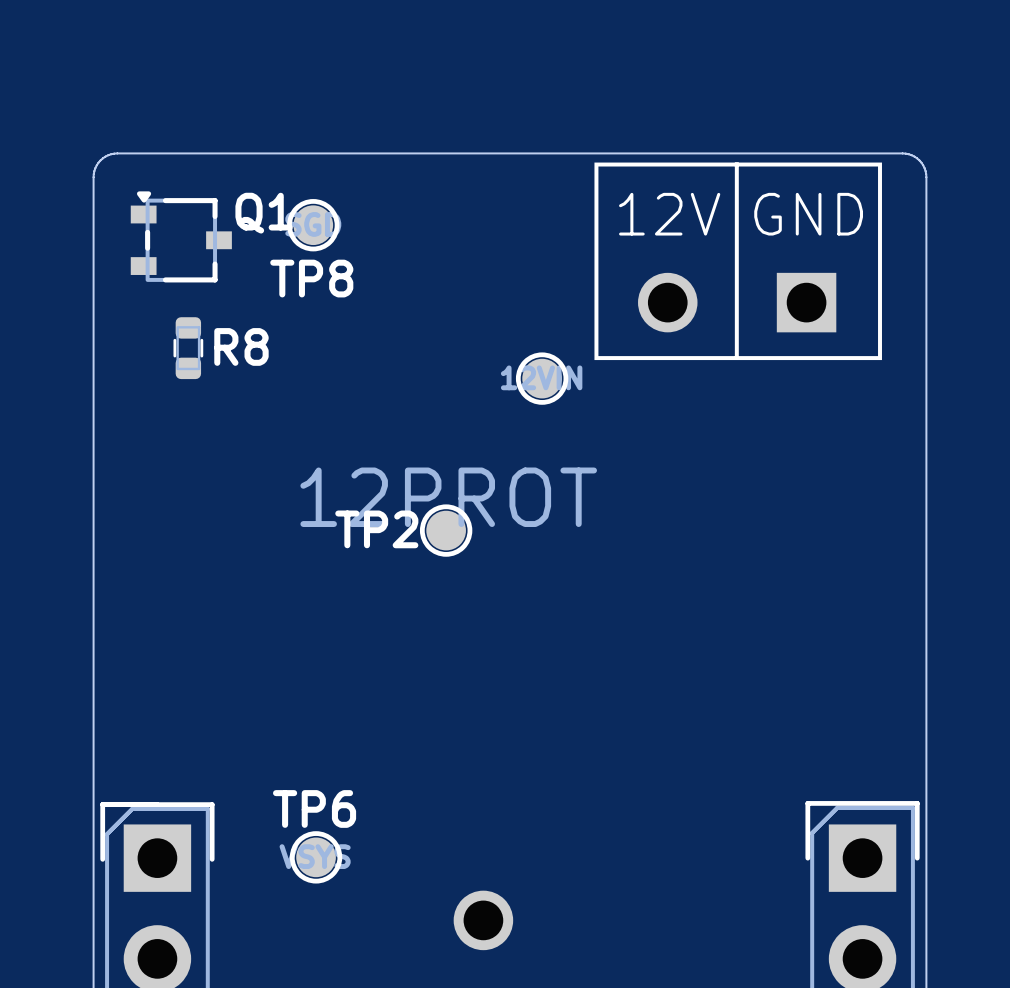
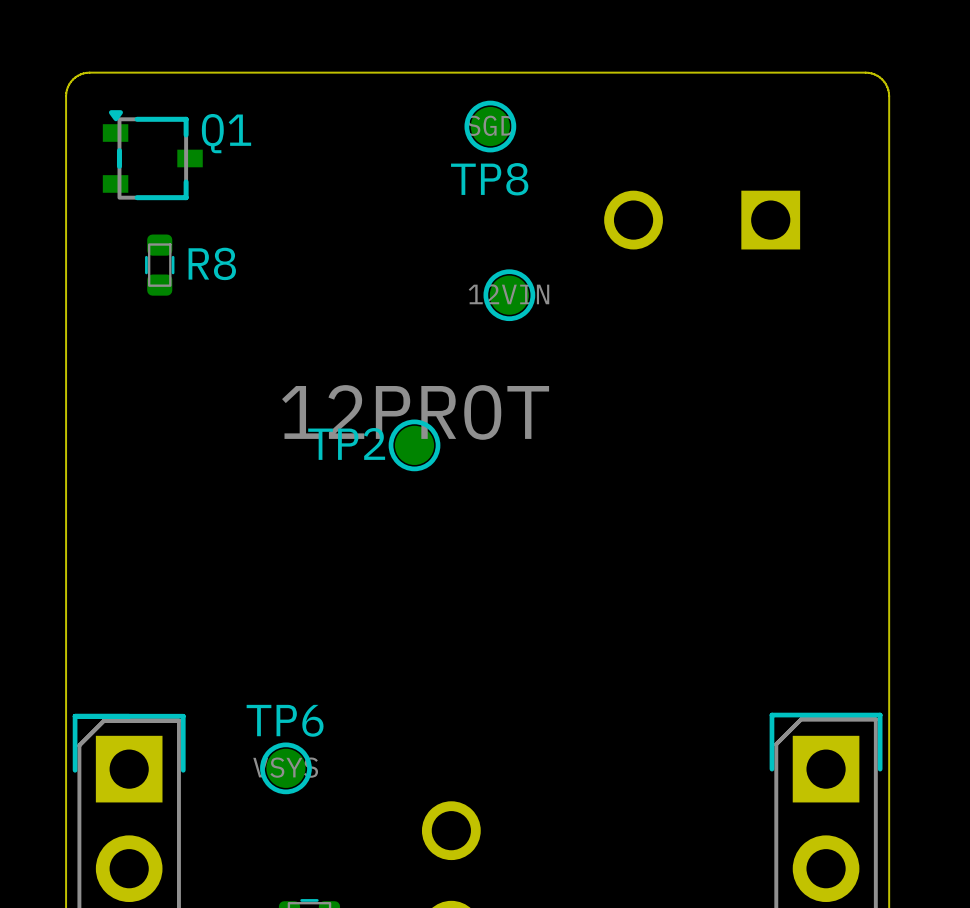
drawing: [594, 162, 882, 361] -> none
text: 12V (669, 214) -> none
text: GND (808, 214) -> none
TP8 position: (313, 225) -> (490, 126)

